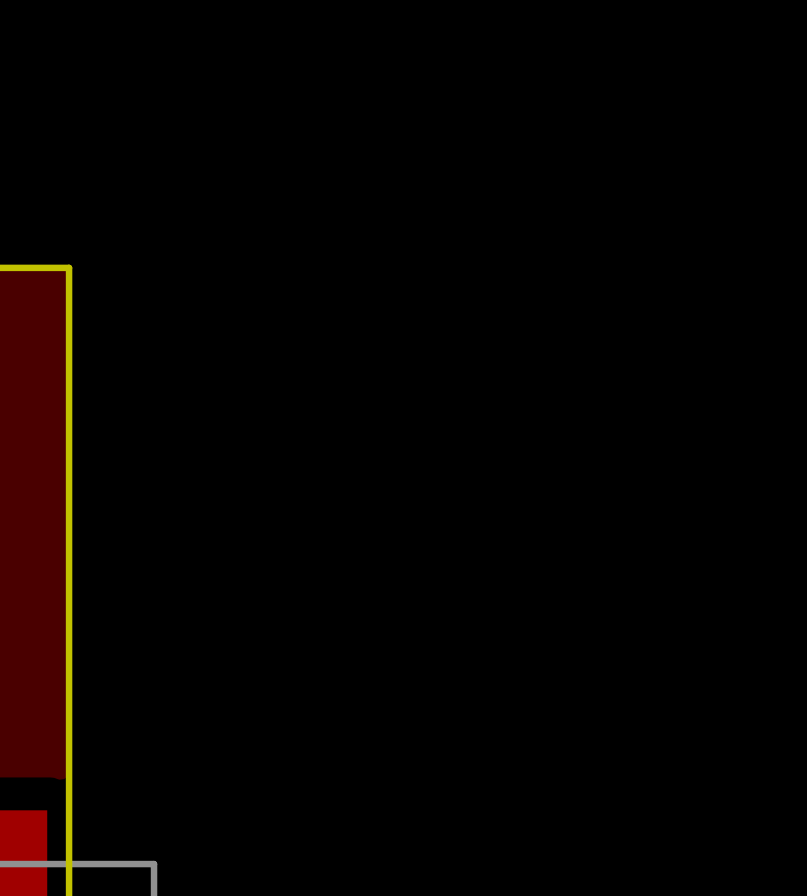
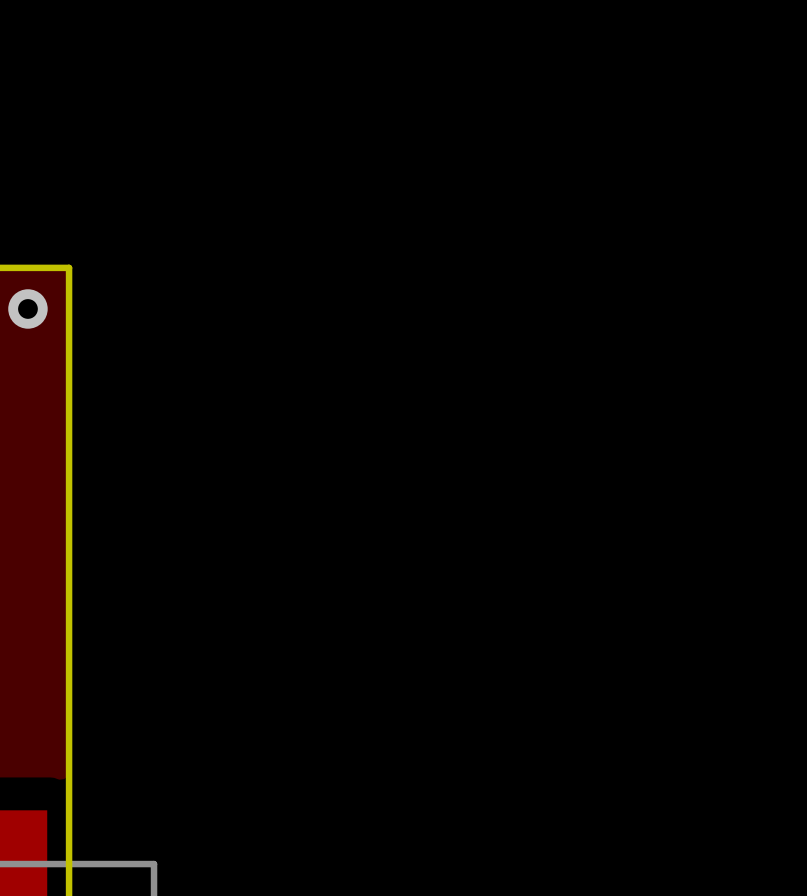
via: none -> (27, 308)

